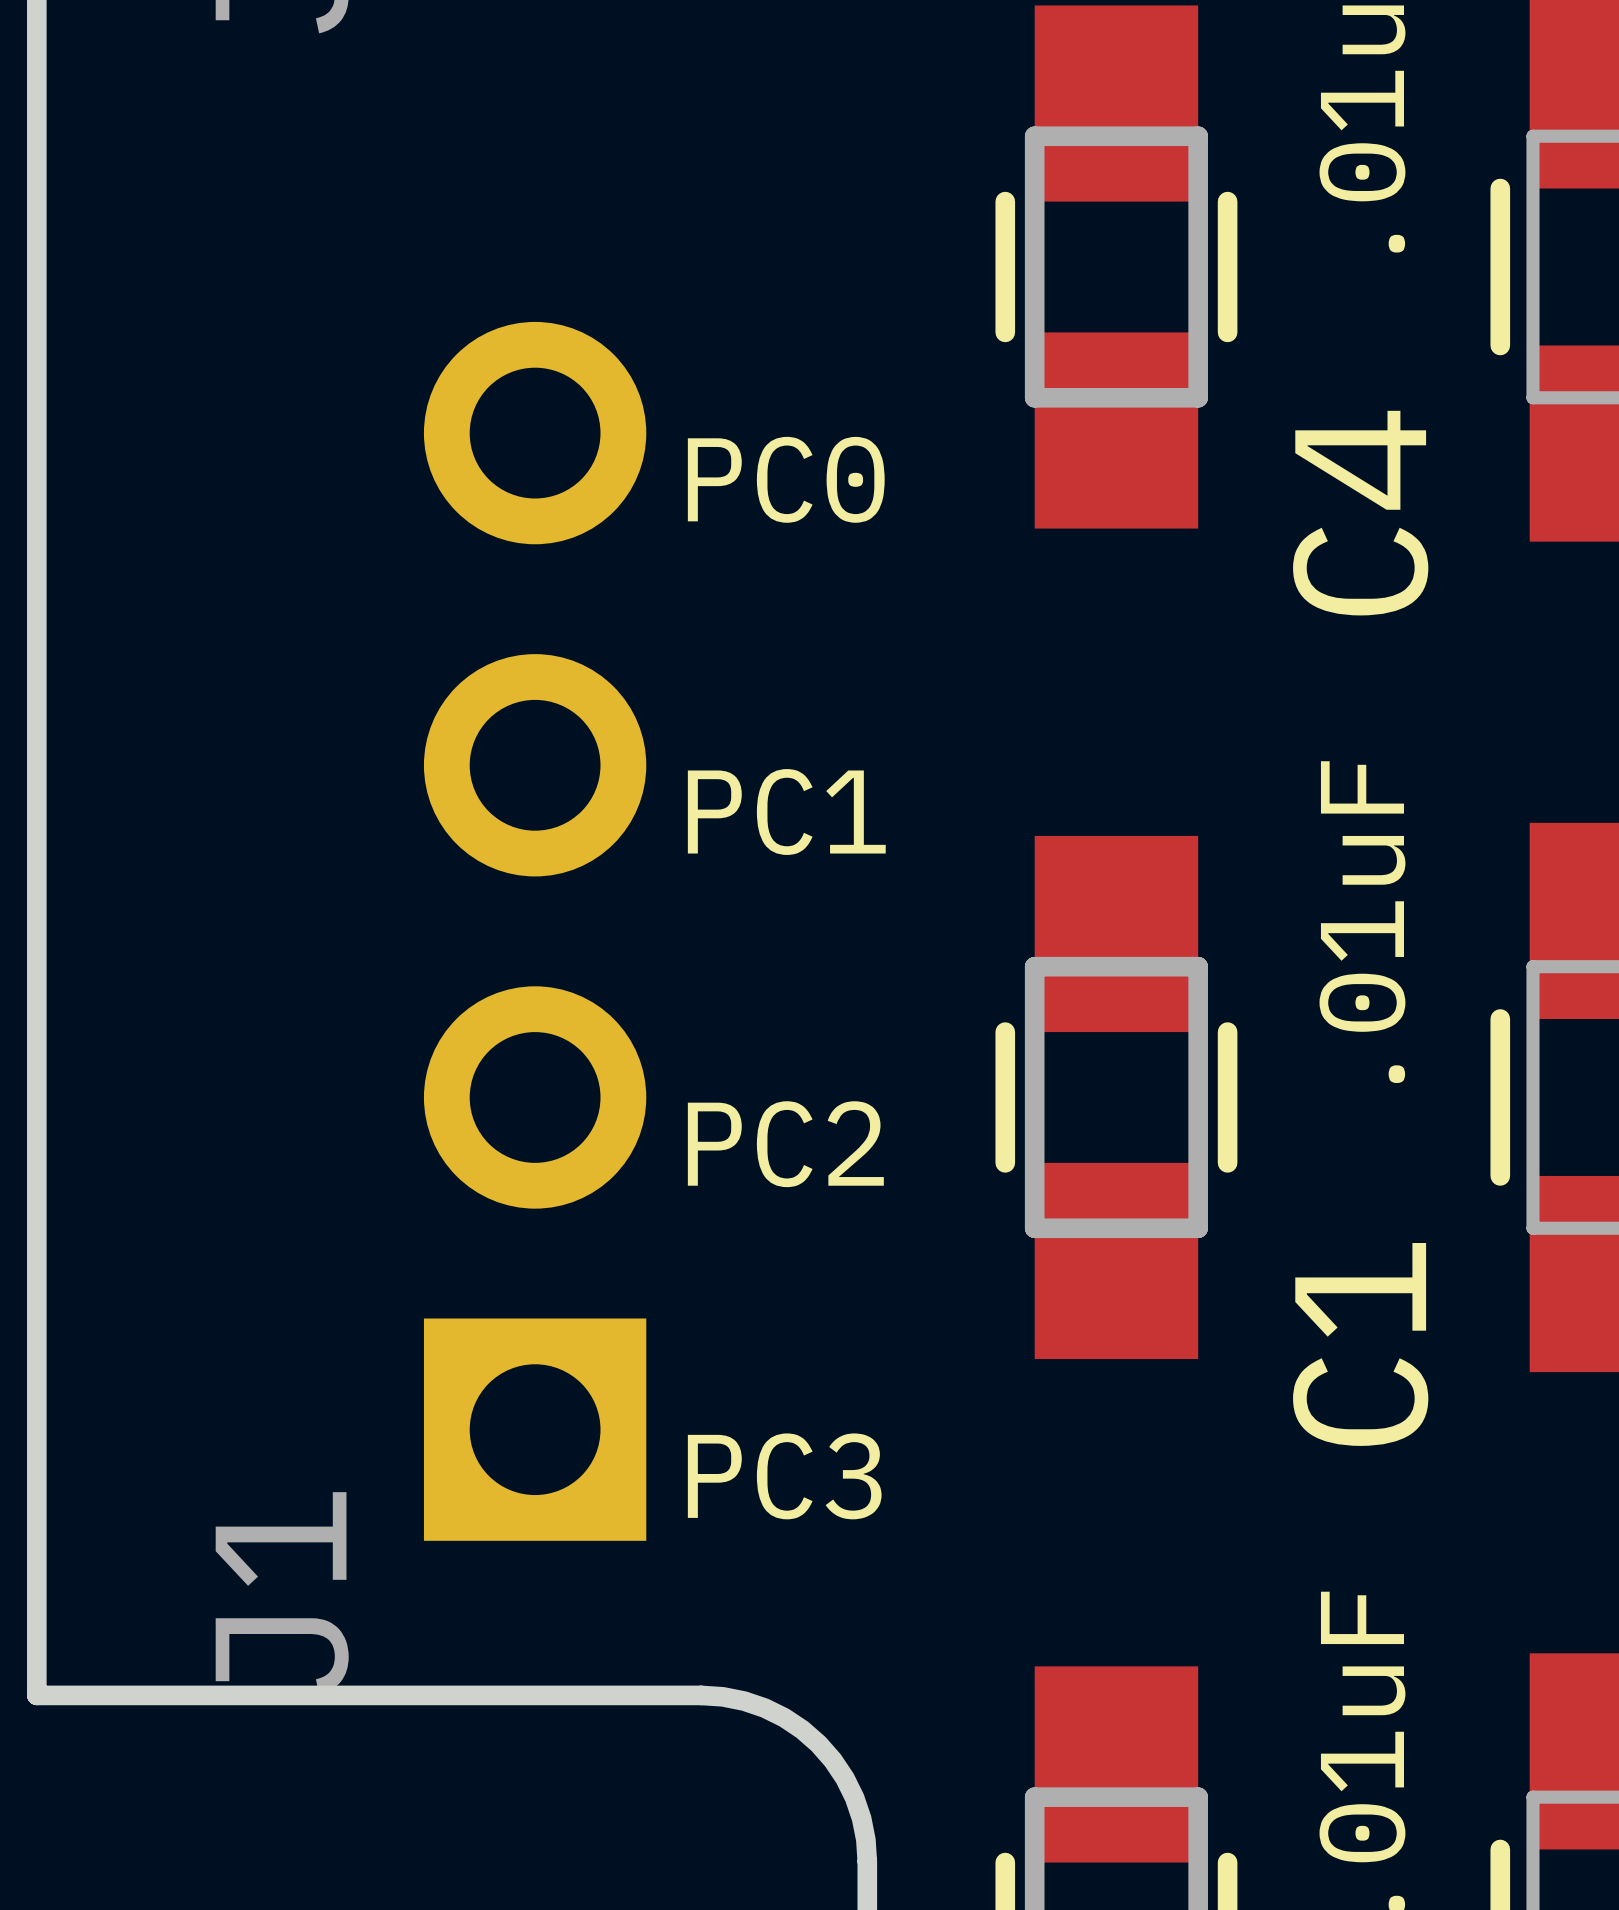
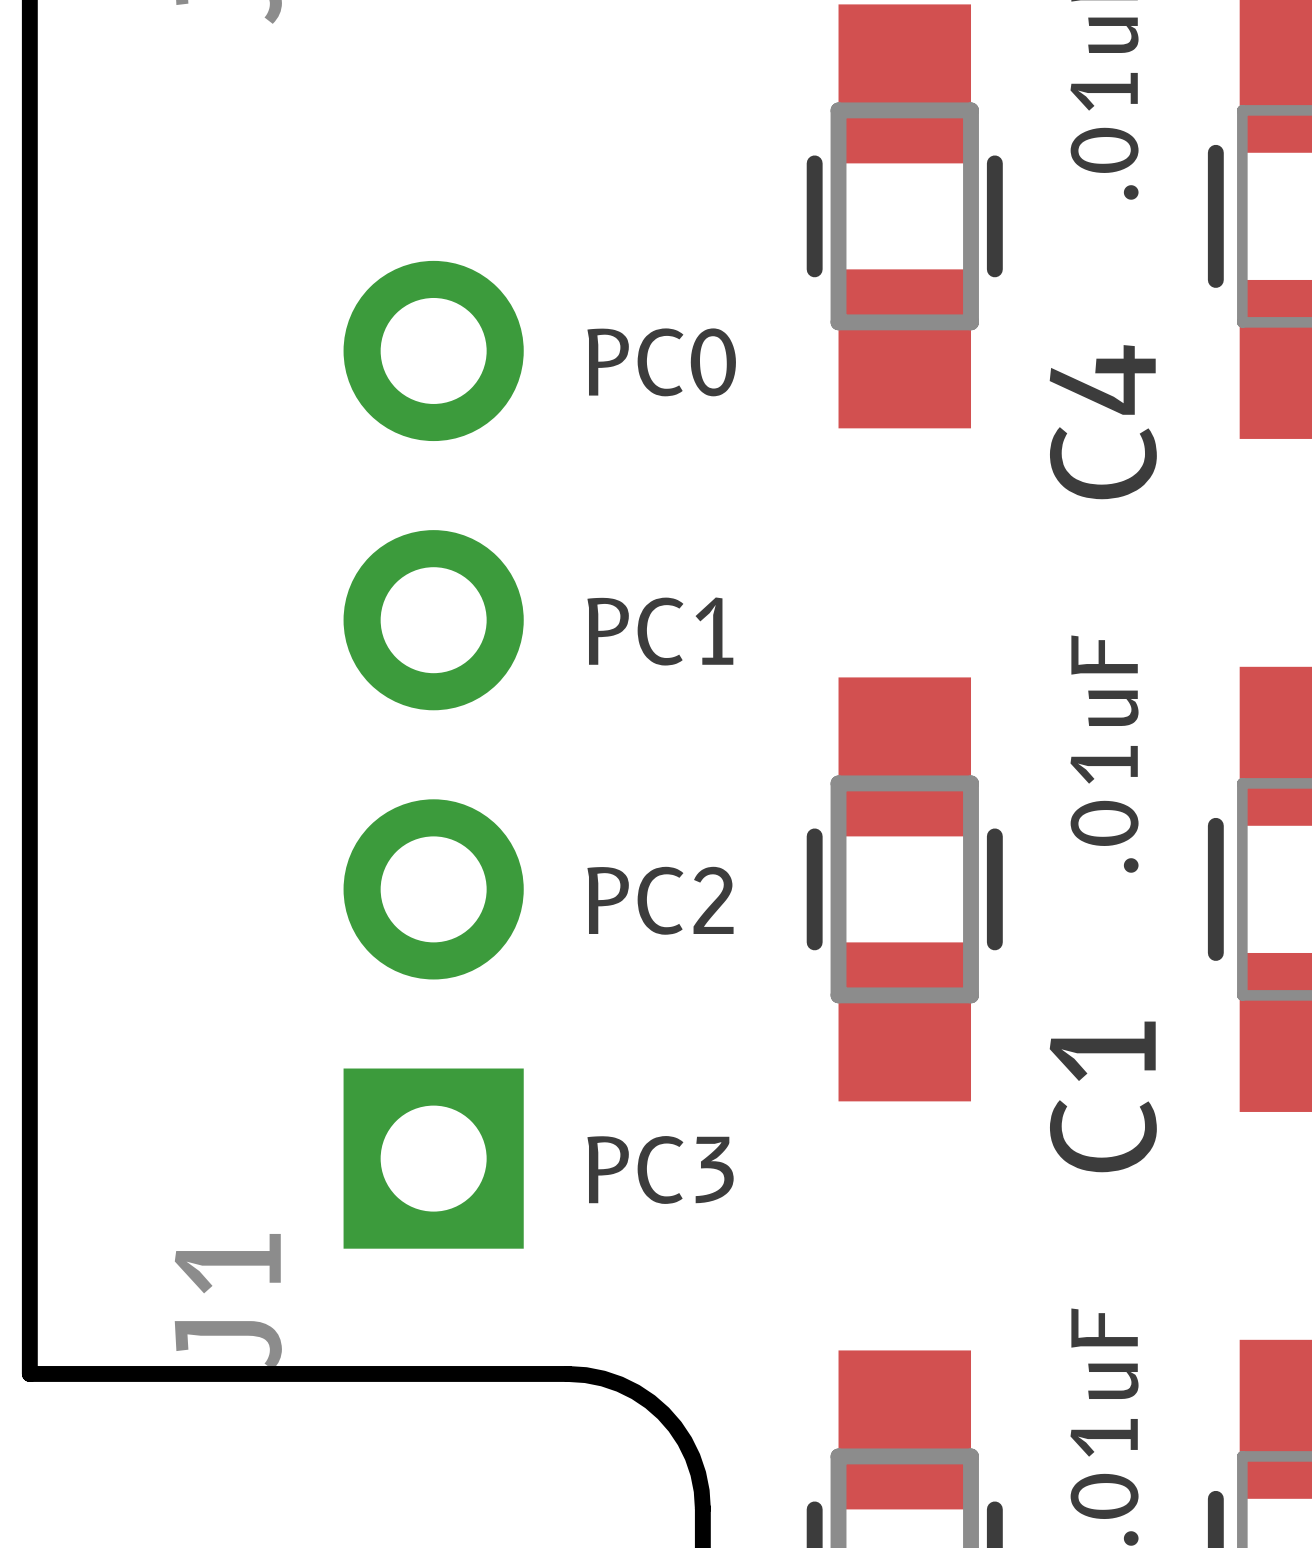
text position: PC0 (786, 479) -> PC0 (661, 362)
text position: PC1 (786, 812) -> PC1 (660, 631)
text position: PC2 (785, 1144) -> PC2 (660, 900)
text position: PC3 (784, 1476) -> PC3 (660, 1169)

